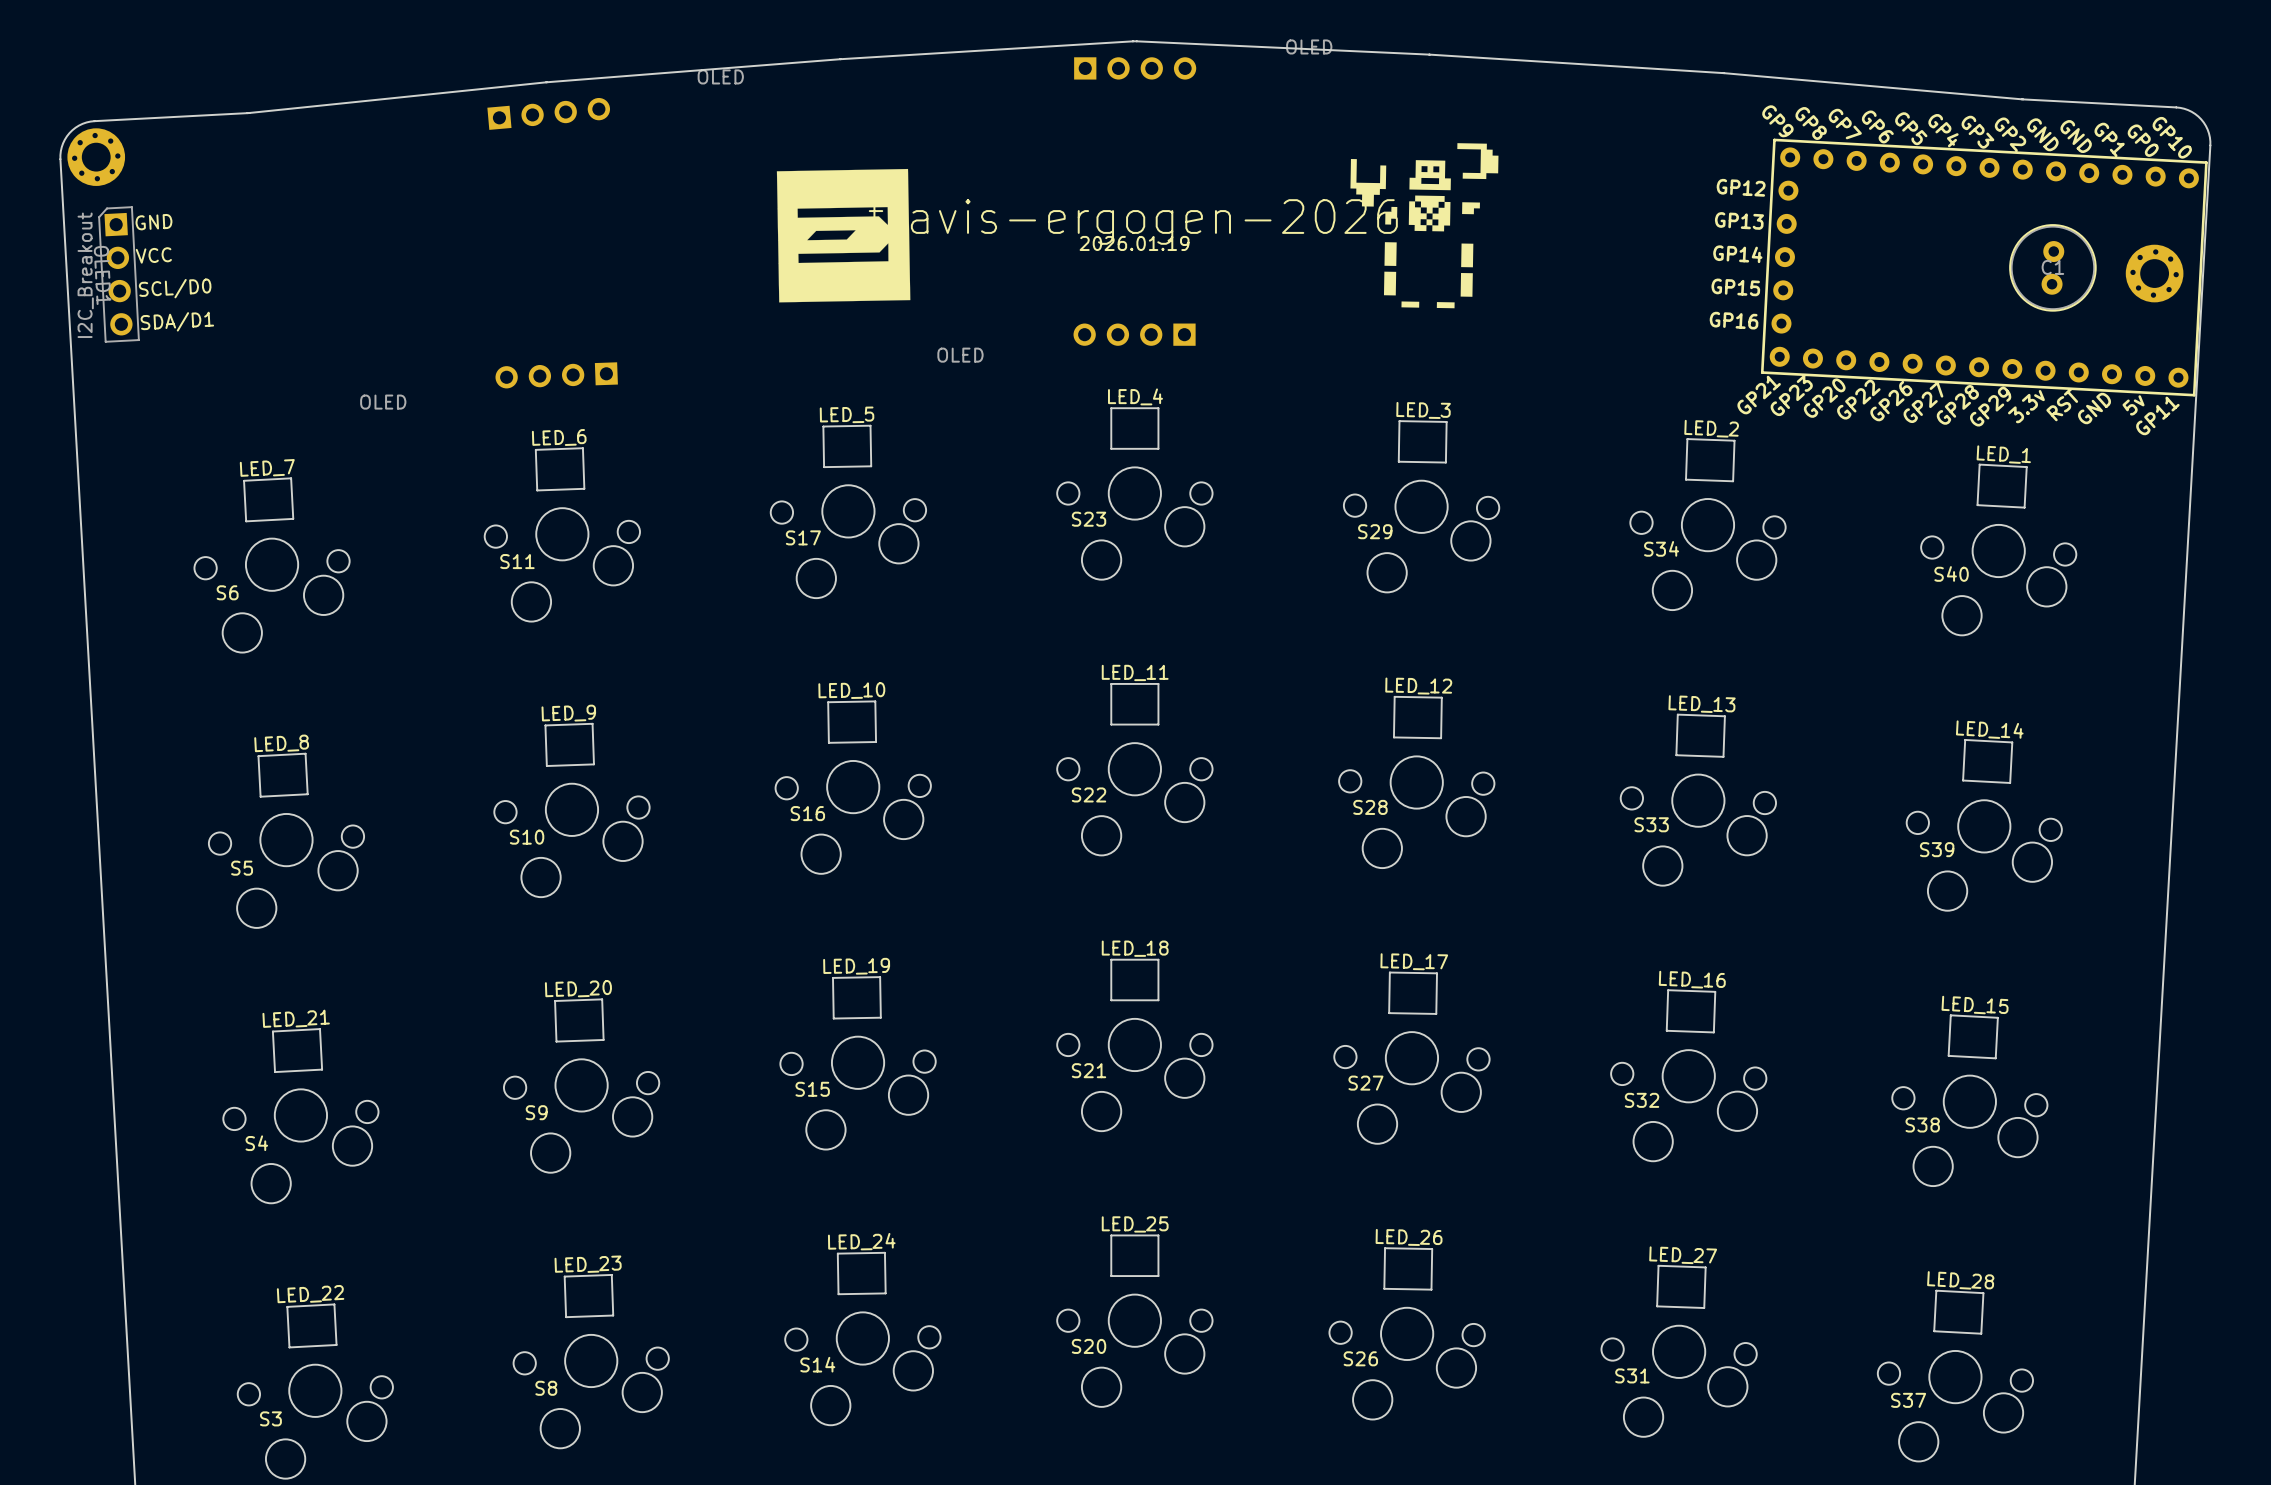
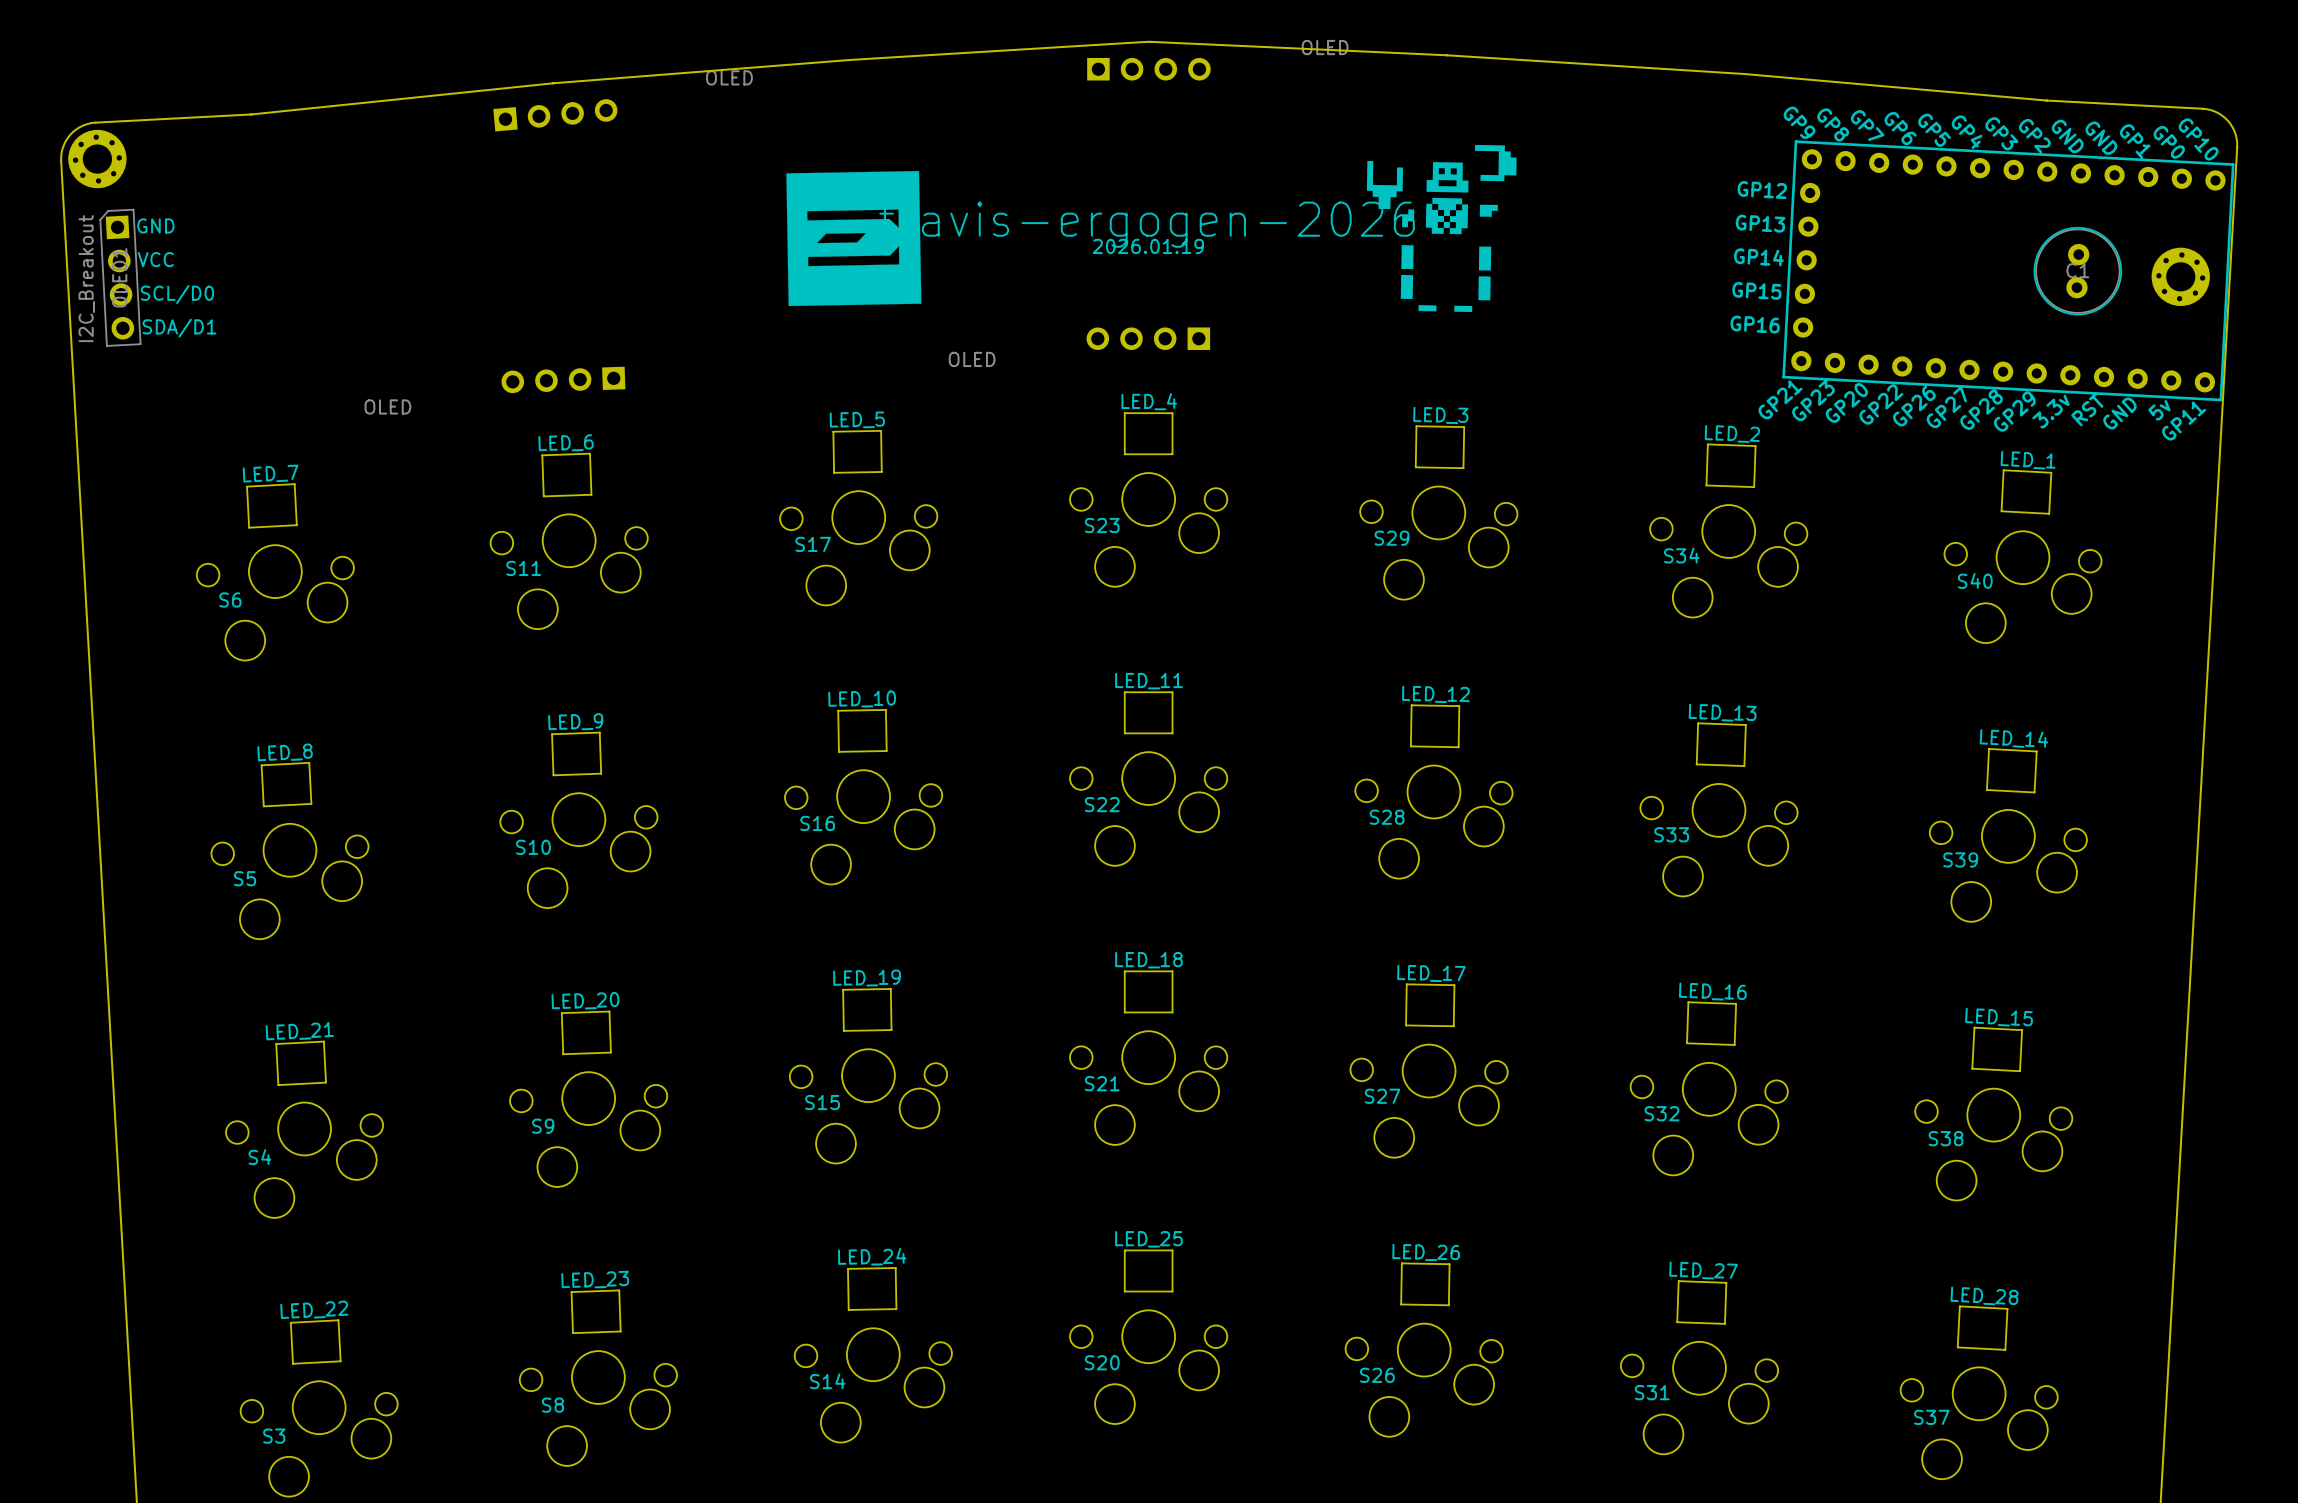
part footprint: [98, 206, 140, 343] -> [99, 209, 142, 347]

